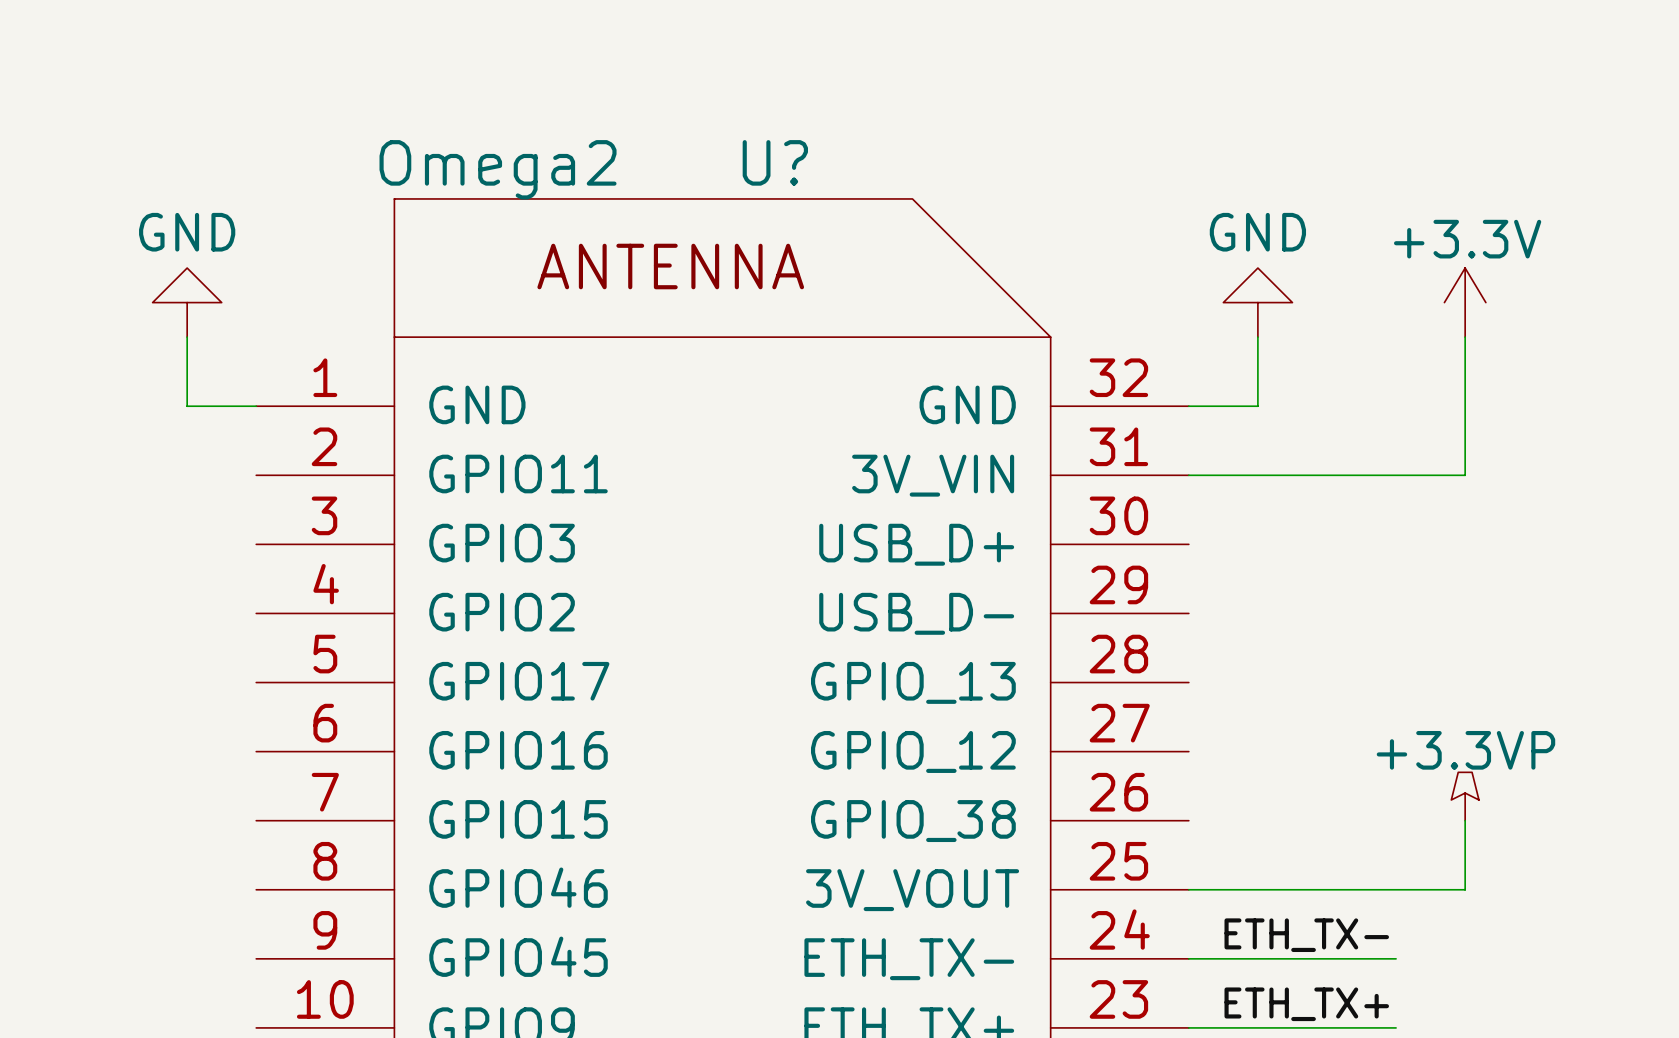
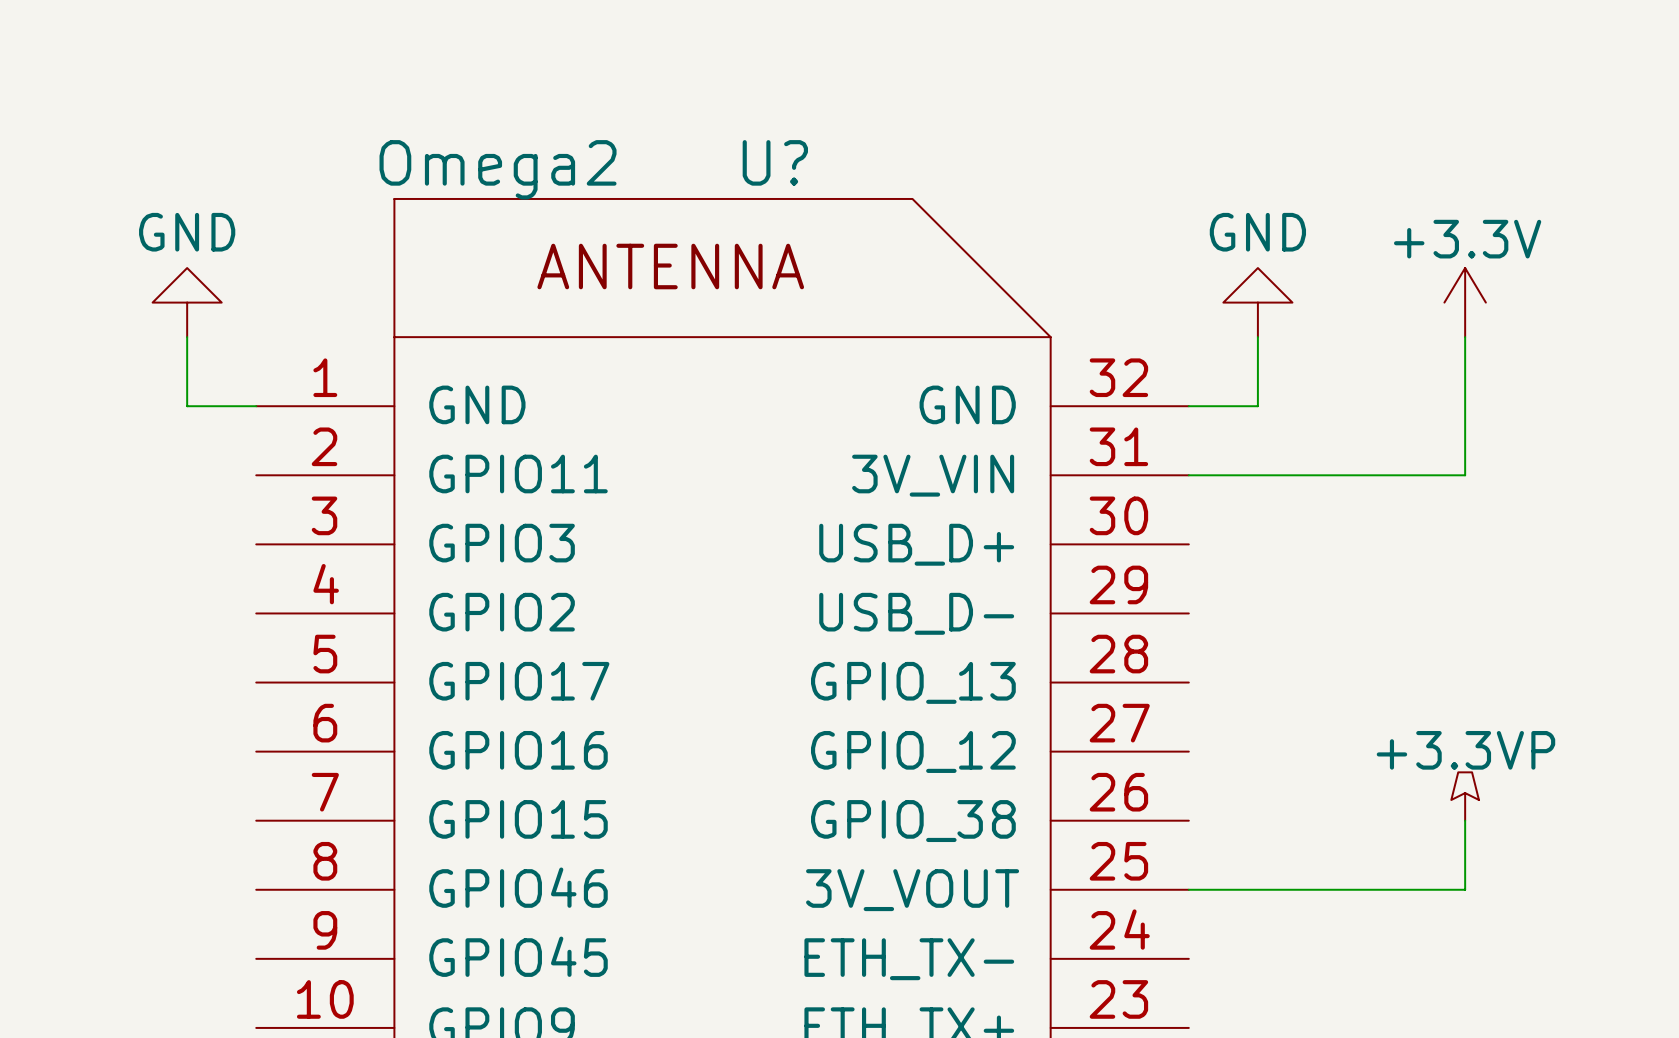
label: ETH_TX- (1306, 935) -> none
wire: (1188, 958) (1396, 958) -> none
label: ETH_TX+ (1306, 1004) -> none
wire: (1188, 1027) (1396, 1027) -> none

